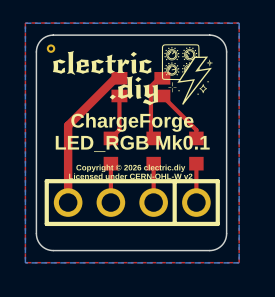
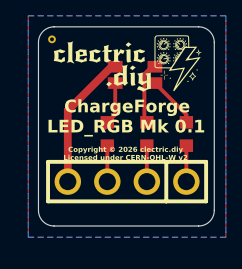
text: LED_RGB Mk0.1 (132, 143) -> LED_RGB Mk 0.1 (126, 127)

